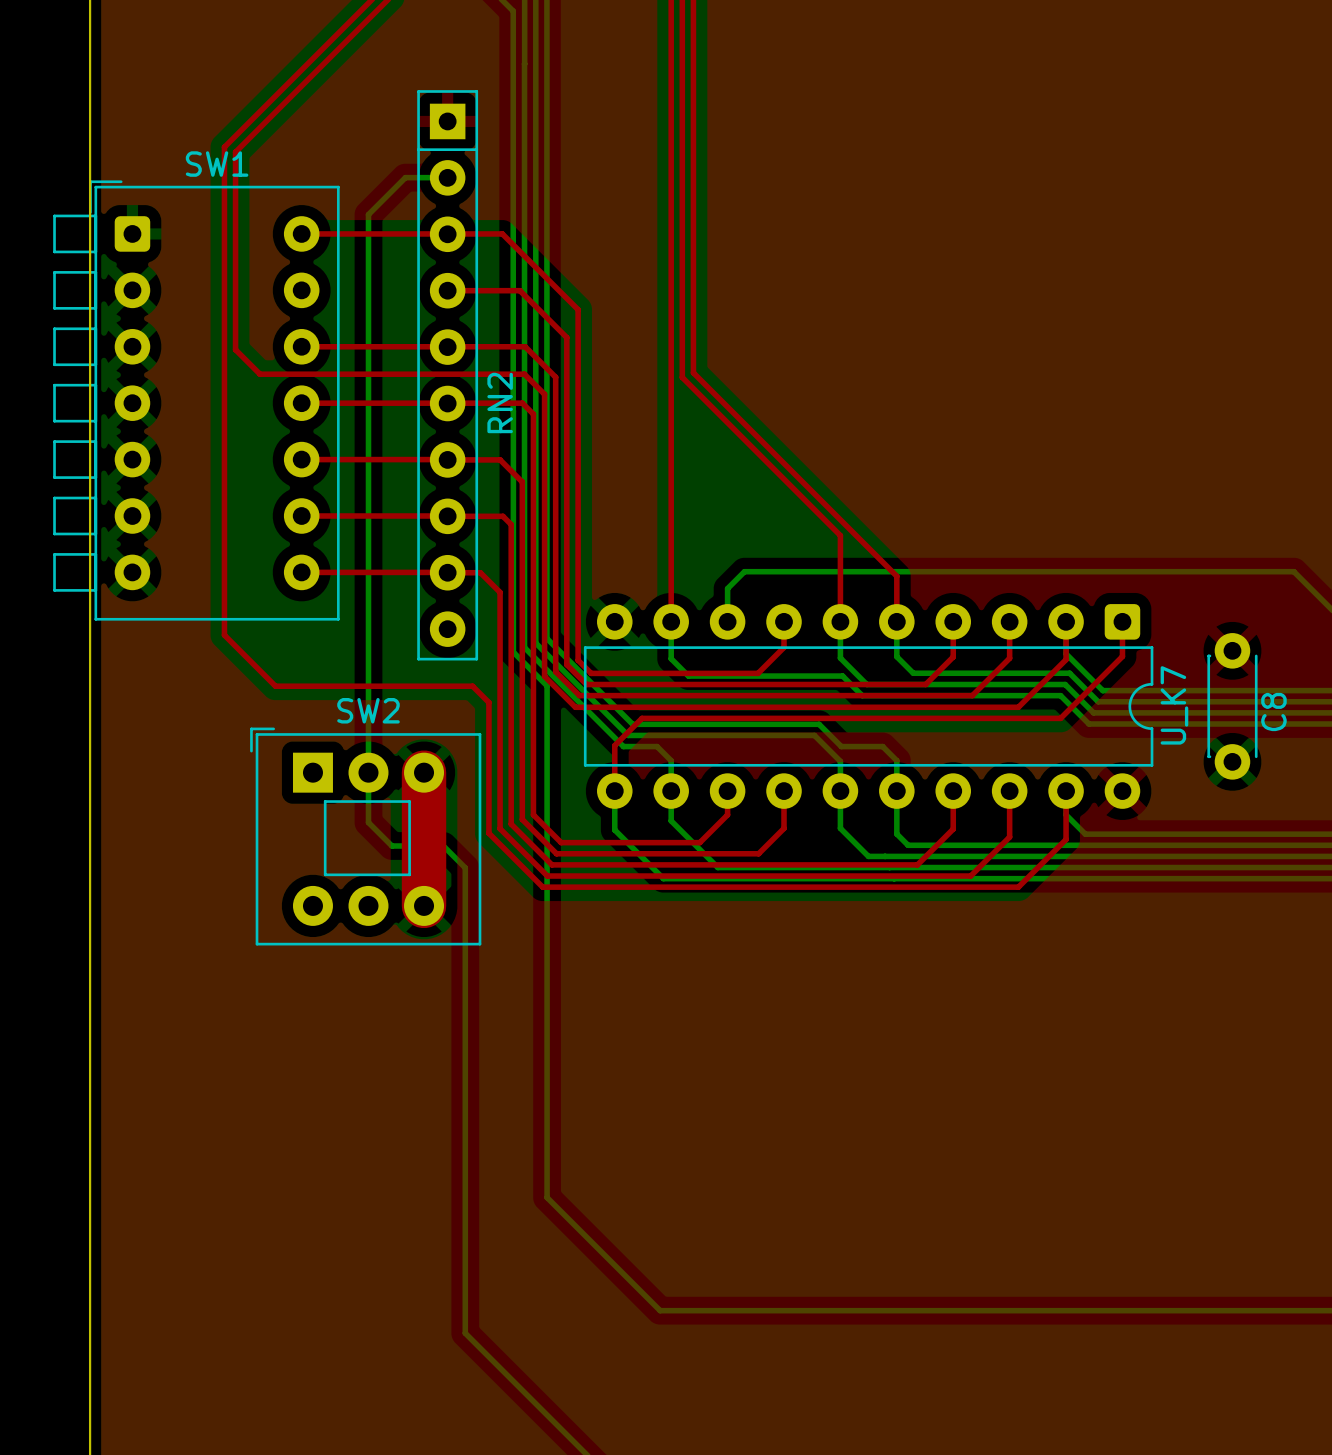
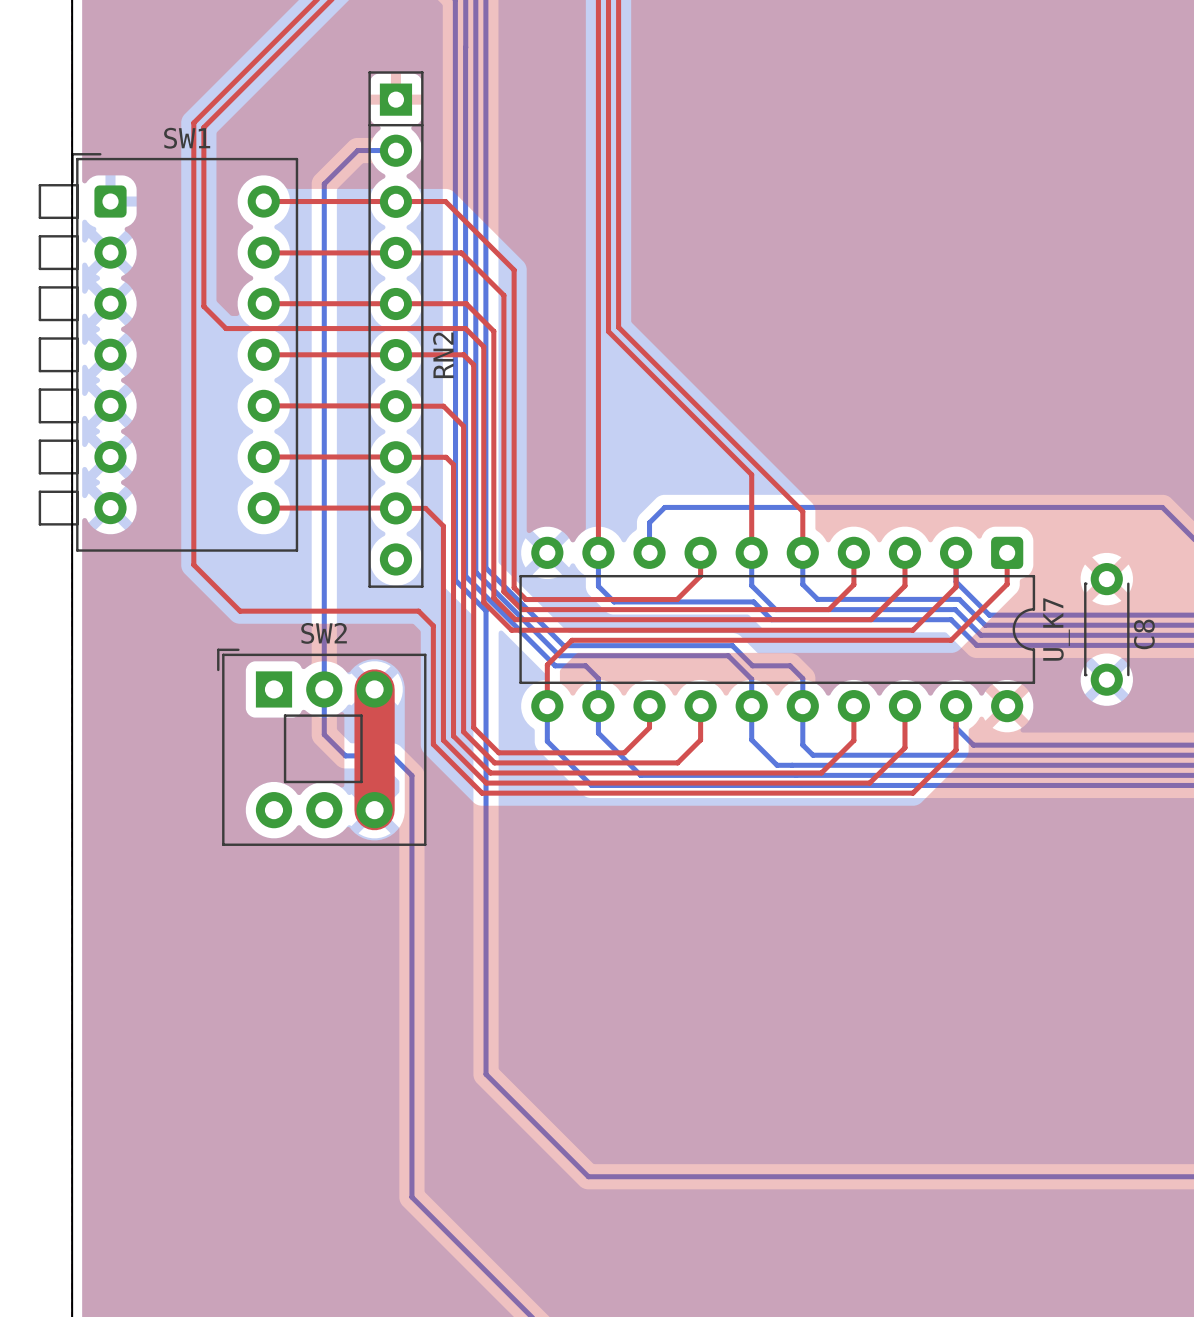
top track: none -> (263, 252) (395, 252)

